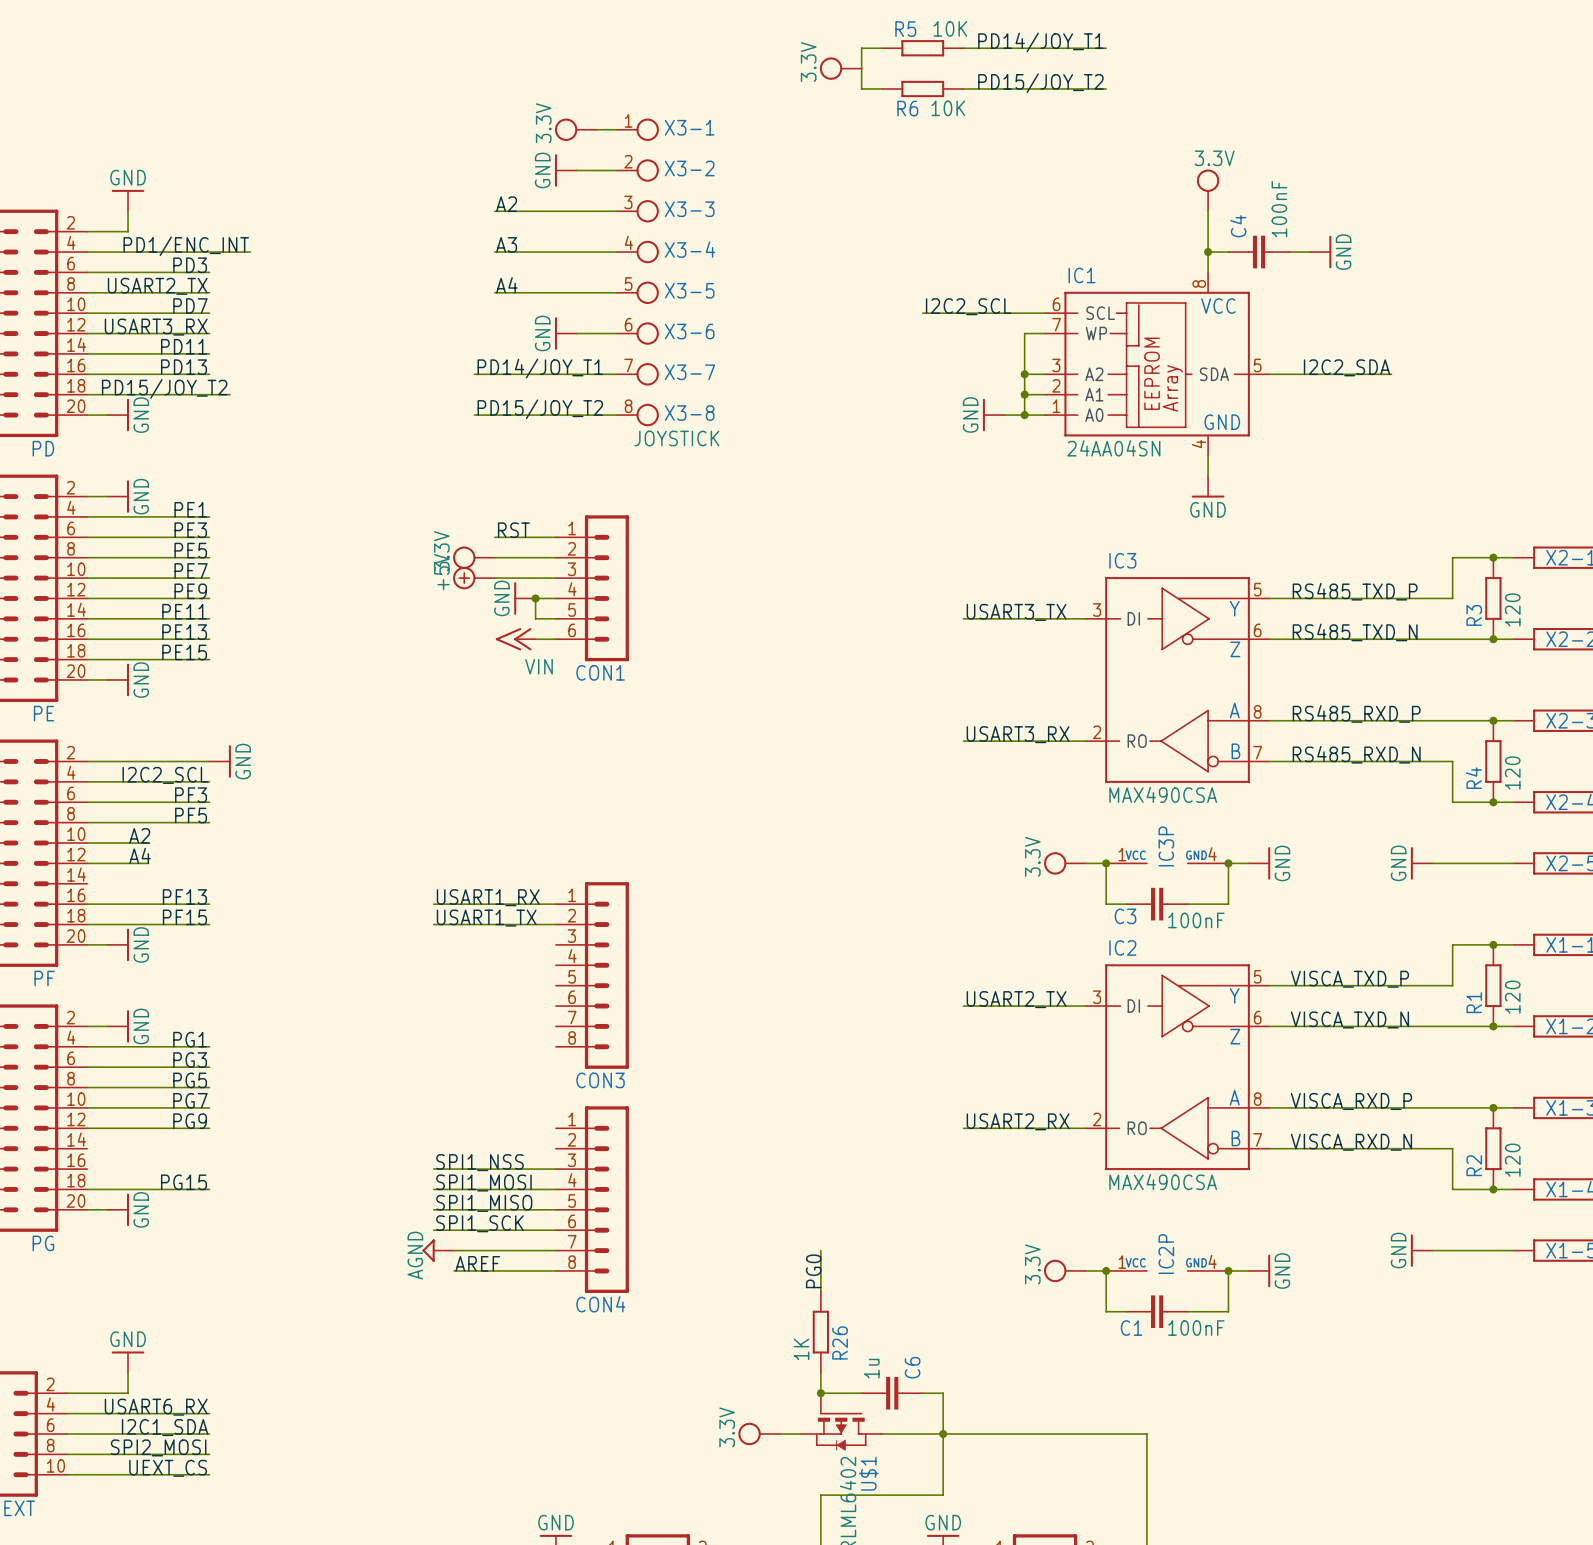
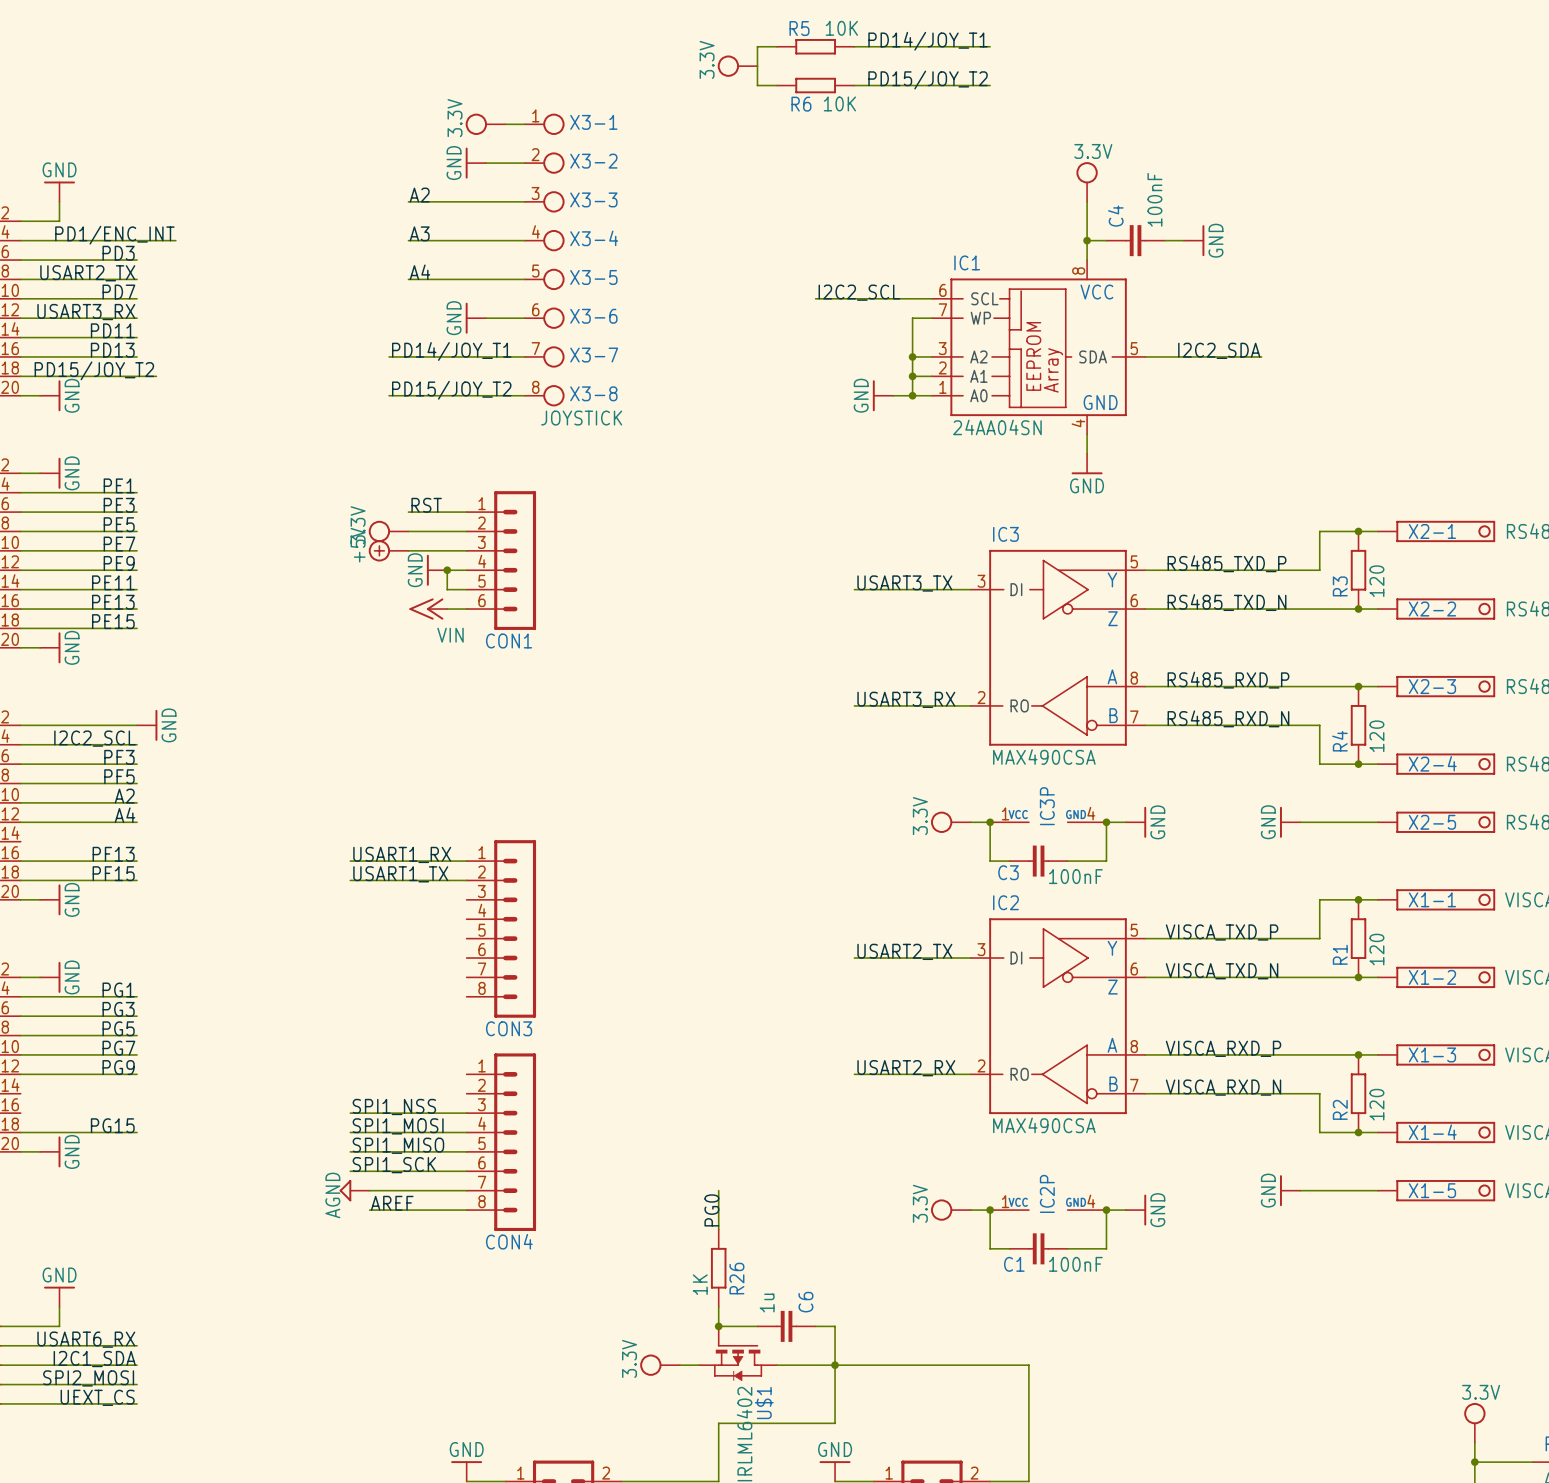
label position: A2 (139, 835) -> A2 (124, 796)
wire: none -> (78, 802) (137, 802)
label position: A4 (140, 855) -> A4 (124, 815)
wire: none -> (78, 822) (137, 822)

